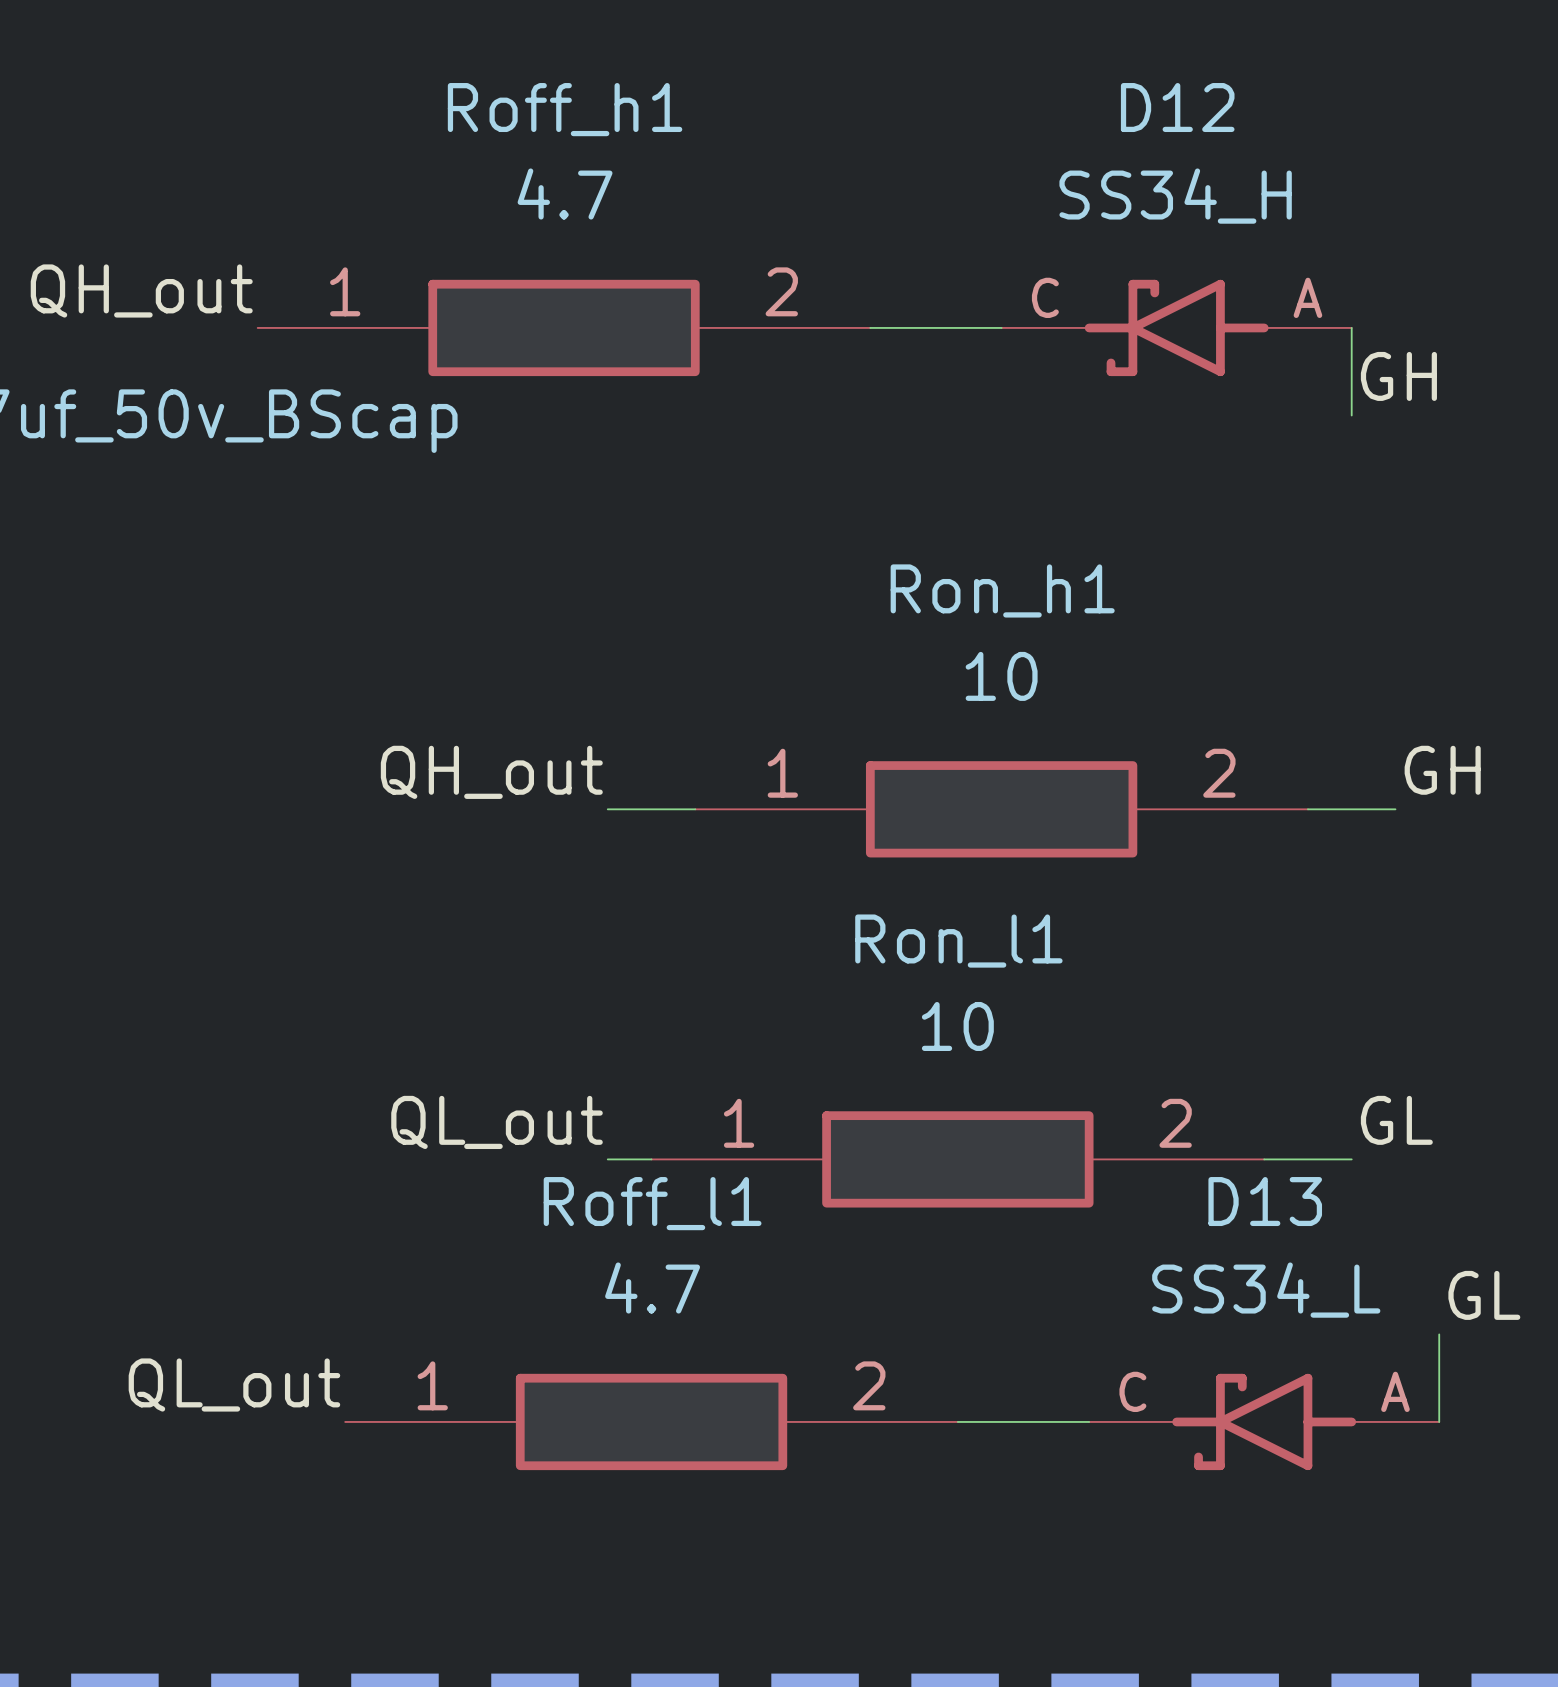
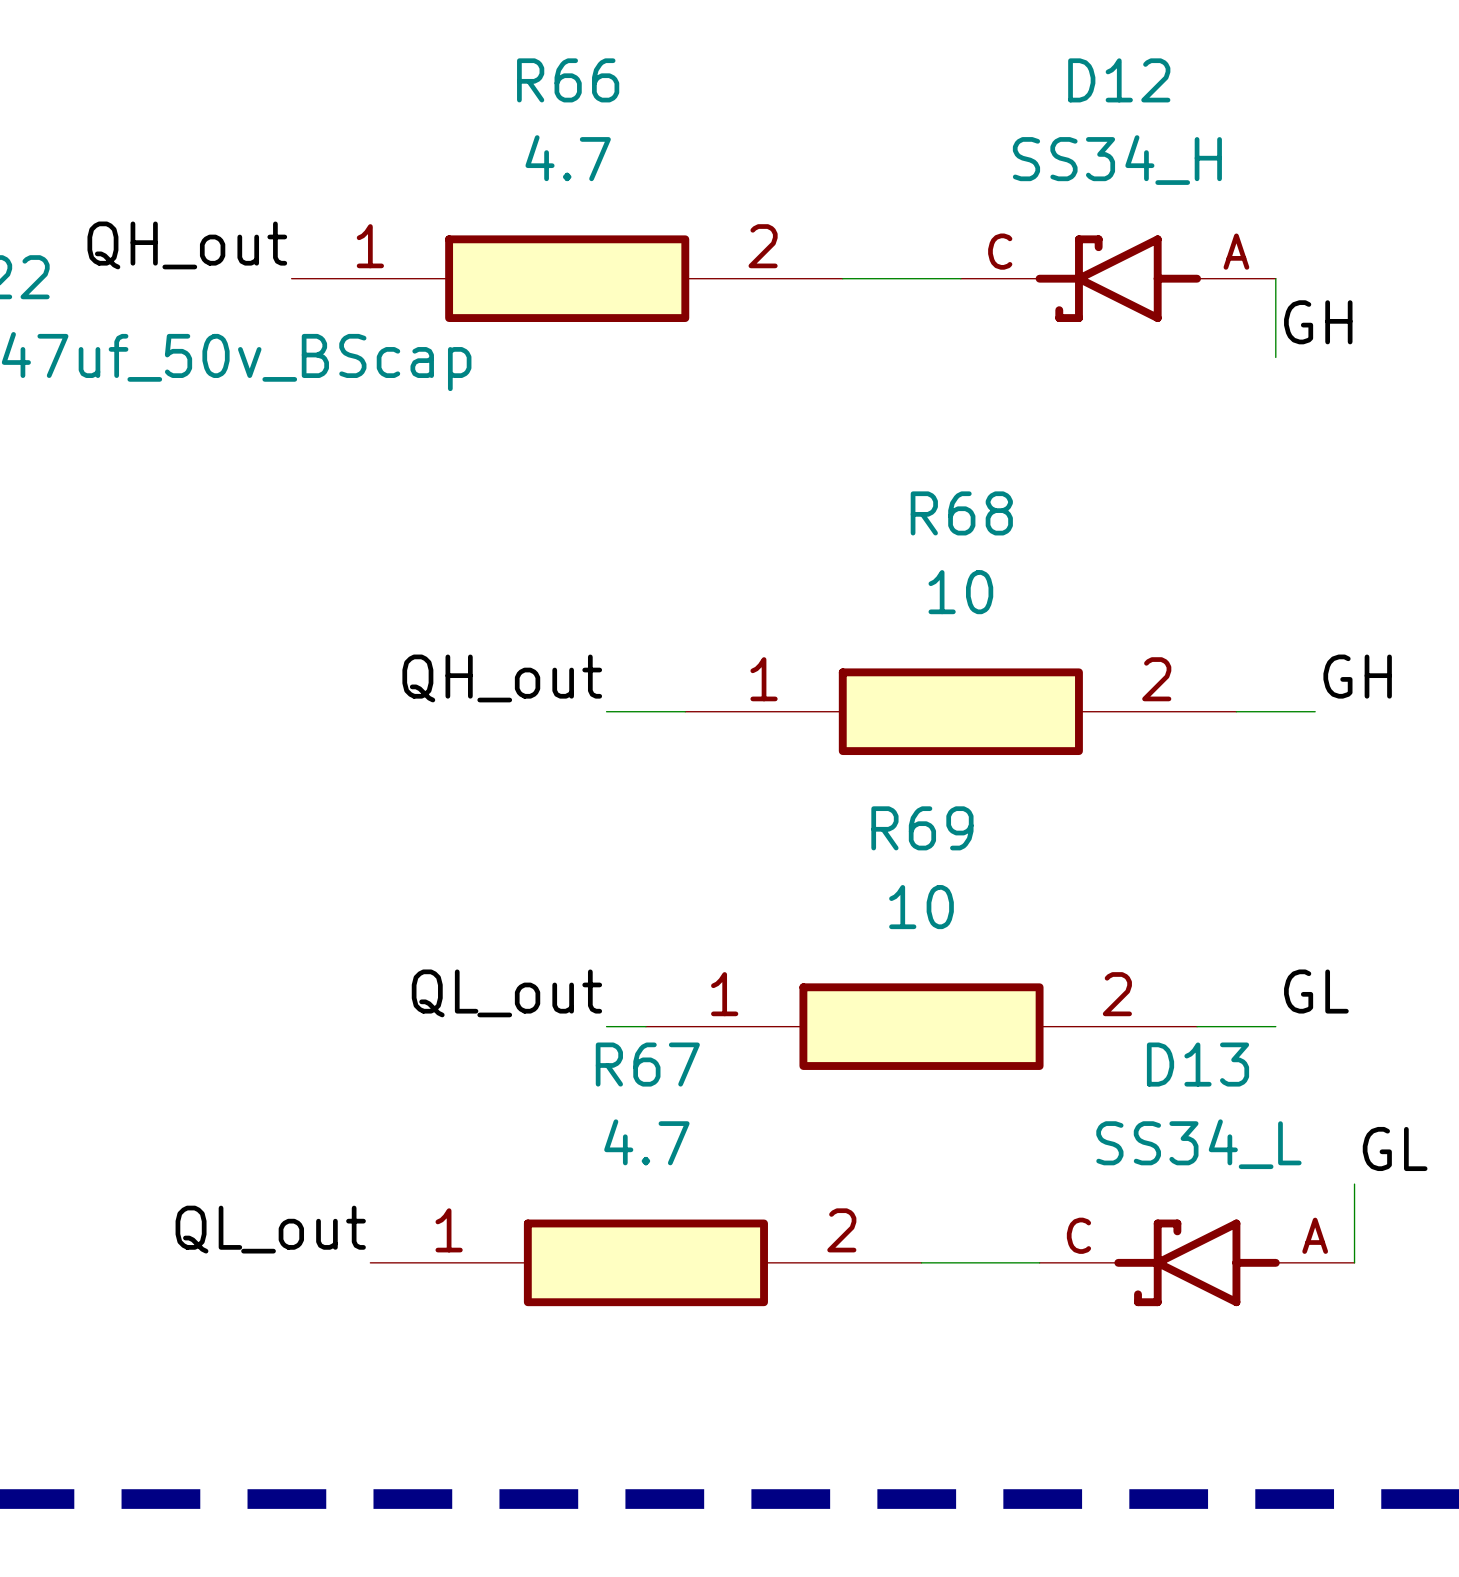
Roff_h1 name: Roff_h1 (565, 109) -> R66 (568, 80)
Ron_h1 name: Ron_h1 (1002, 590) -> R68 (961, 513)
Ron_l1 name: Ron_l1 (958, 941) -> R69 (922, 828)
Roff_l1 name: Roff_l1 (652, 1203) -> R67 (647, 1064)

